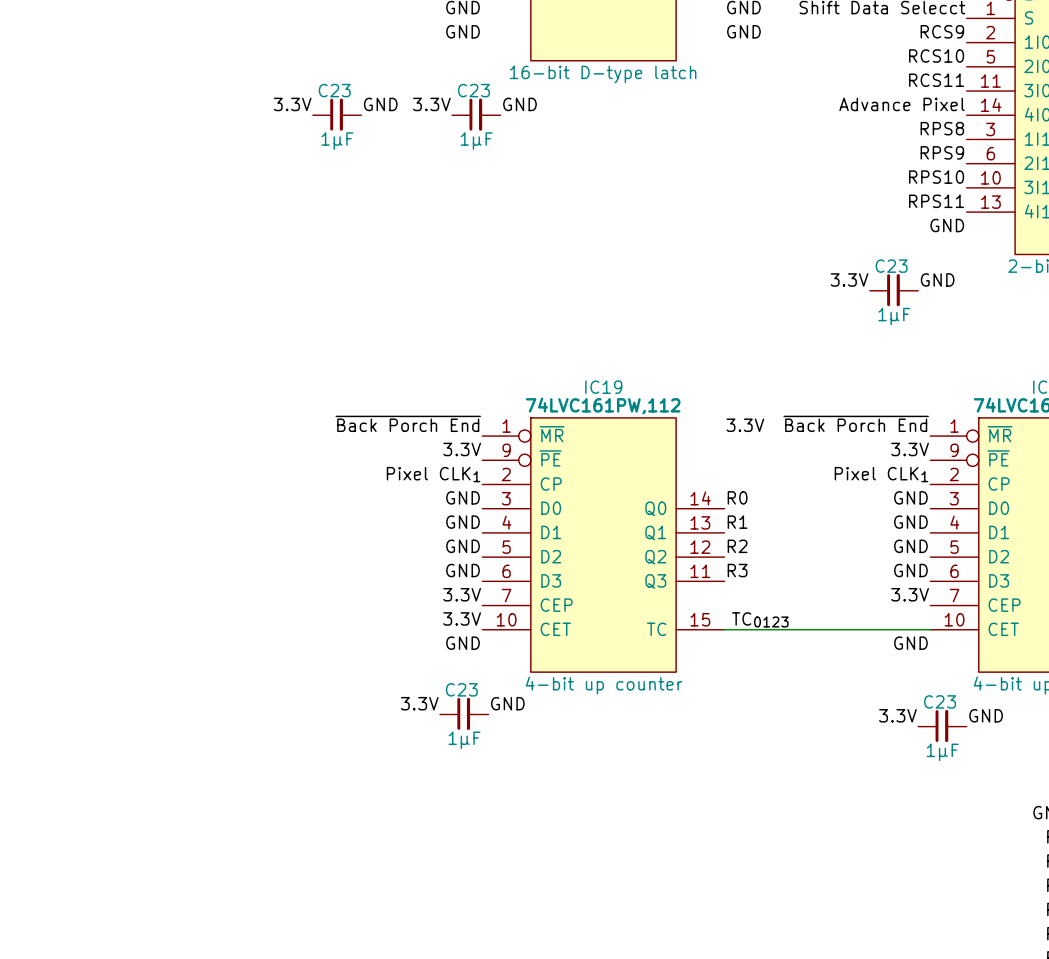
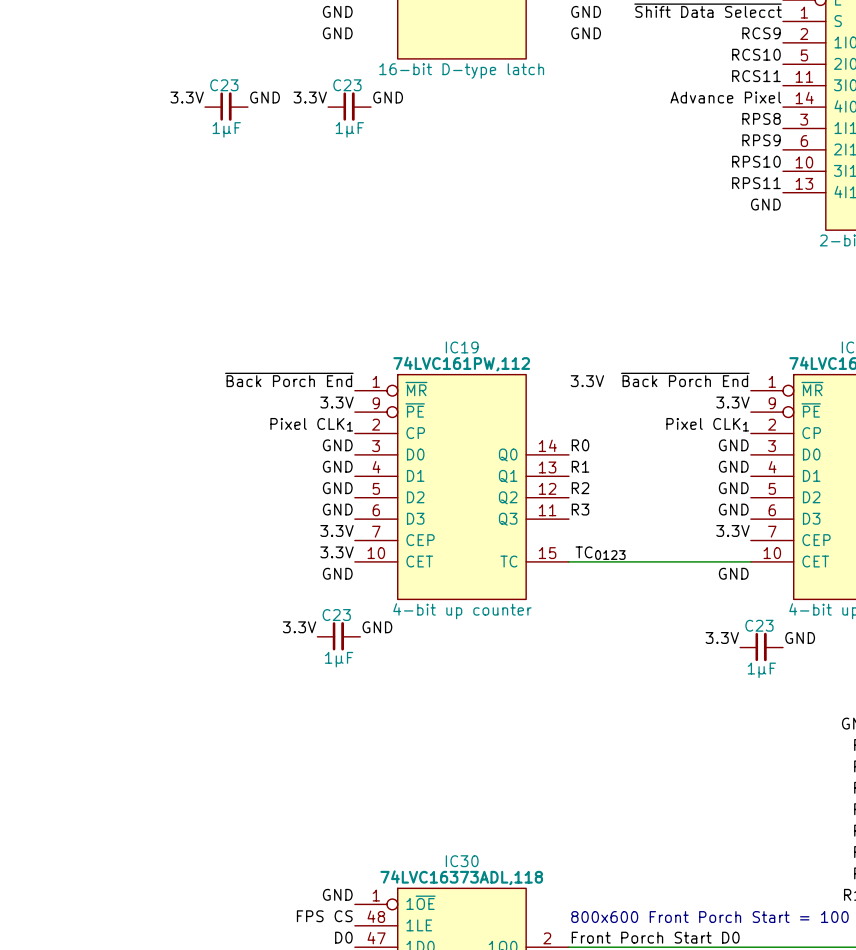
label: 3.3V (849, 279) -> none
label: GND (937, 279) -> none
C23: 1μF (894, 290) -> none

